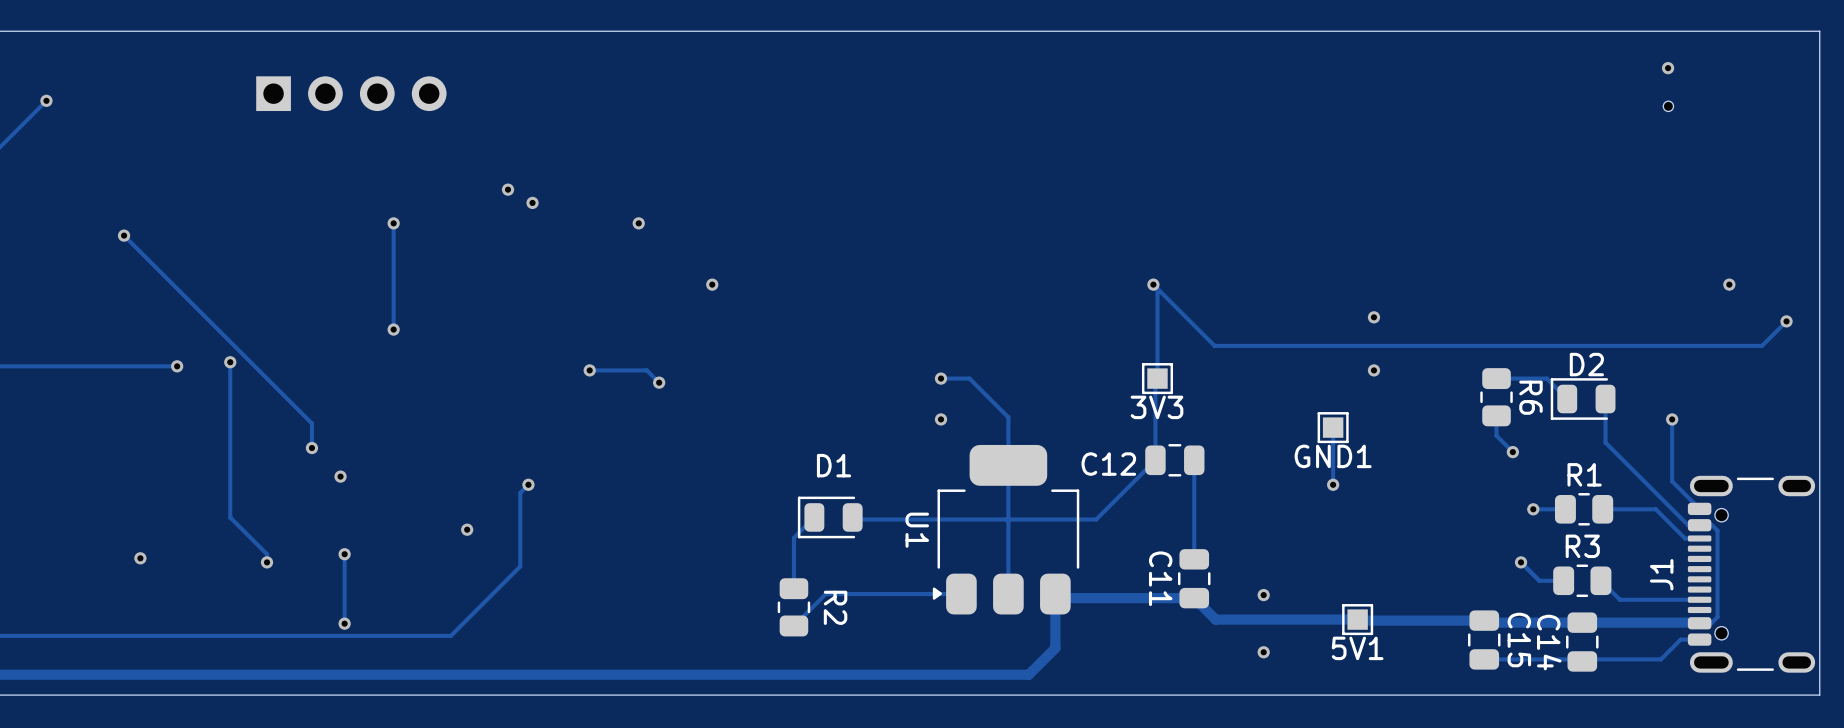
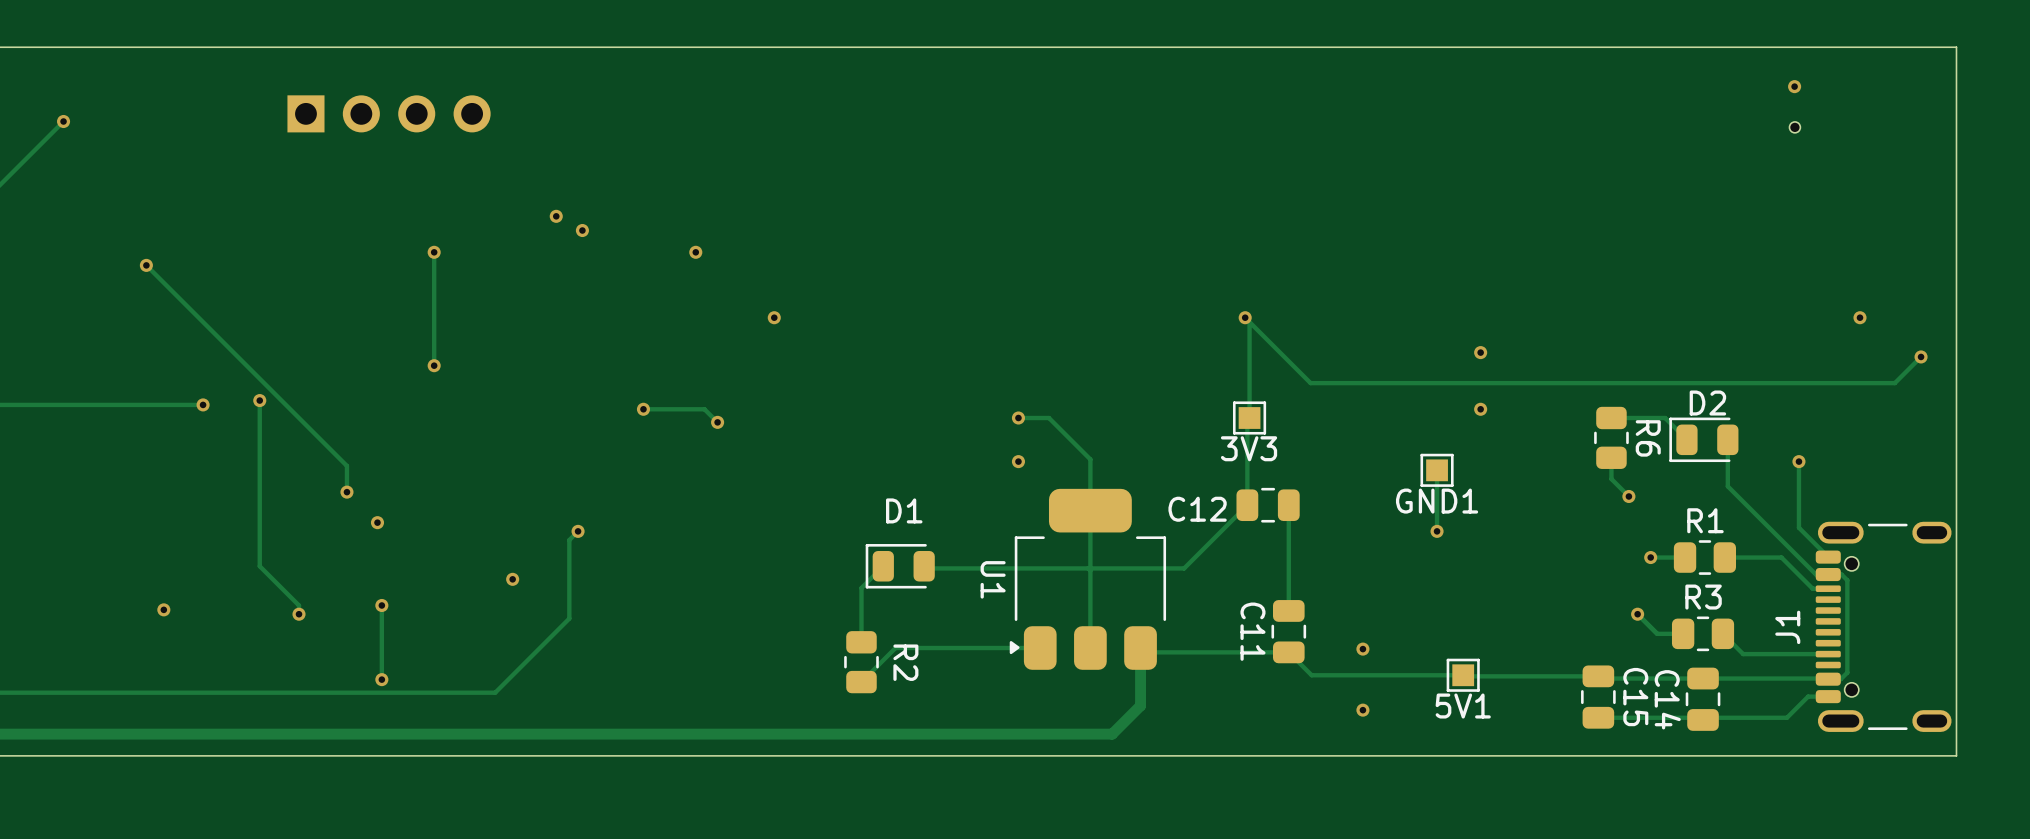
track width: thick (1059, 598) (1194, 598) (1215, 619) (1357, 619) -> thin (1144, 652) (1288, 652) (1311, 675) (1463, 675)
track width: thick (1484, 620) (1358, 620) -> thin (1598, 676) (1464, 676)
track width: thick (1692, 622) (1486, 622) -> thin (1820, 678) (1600, 678)

